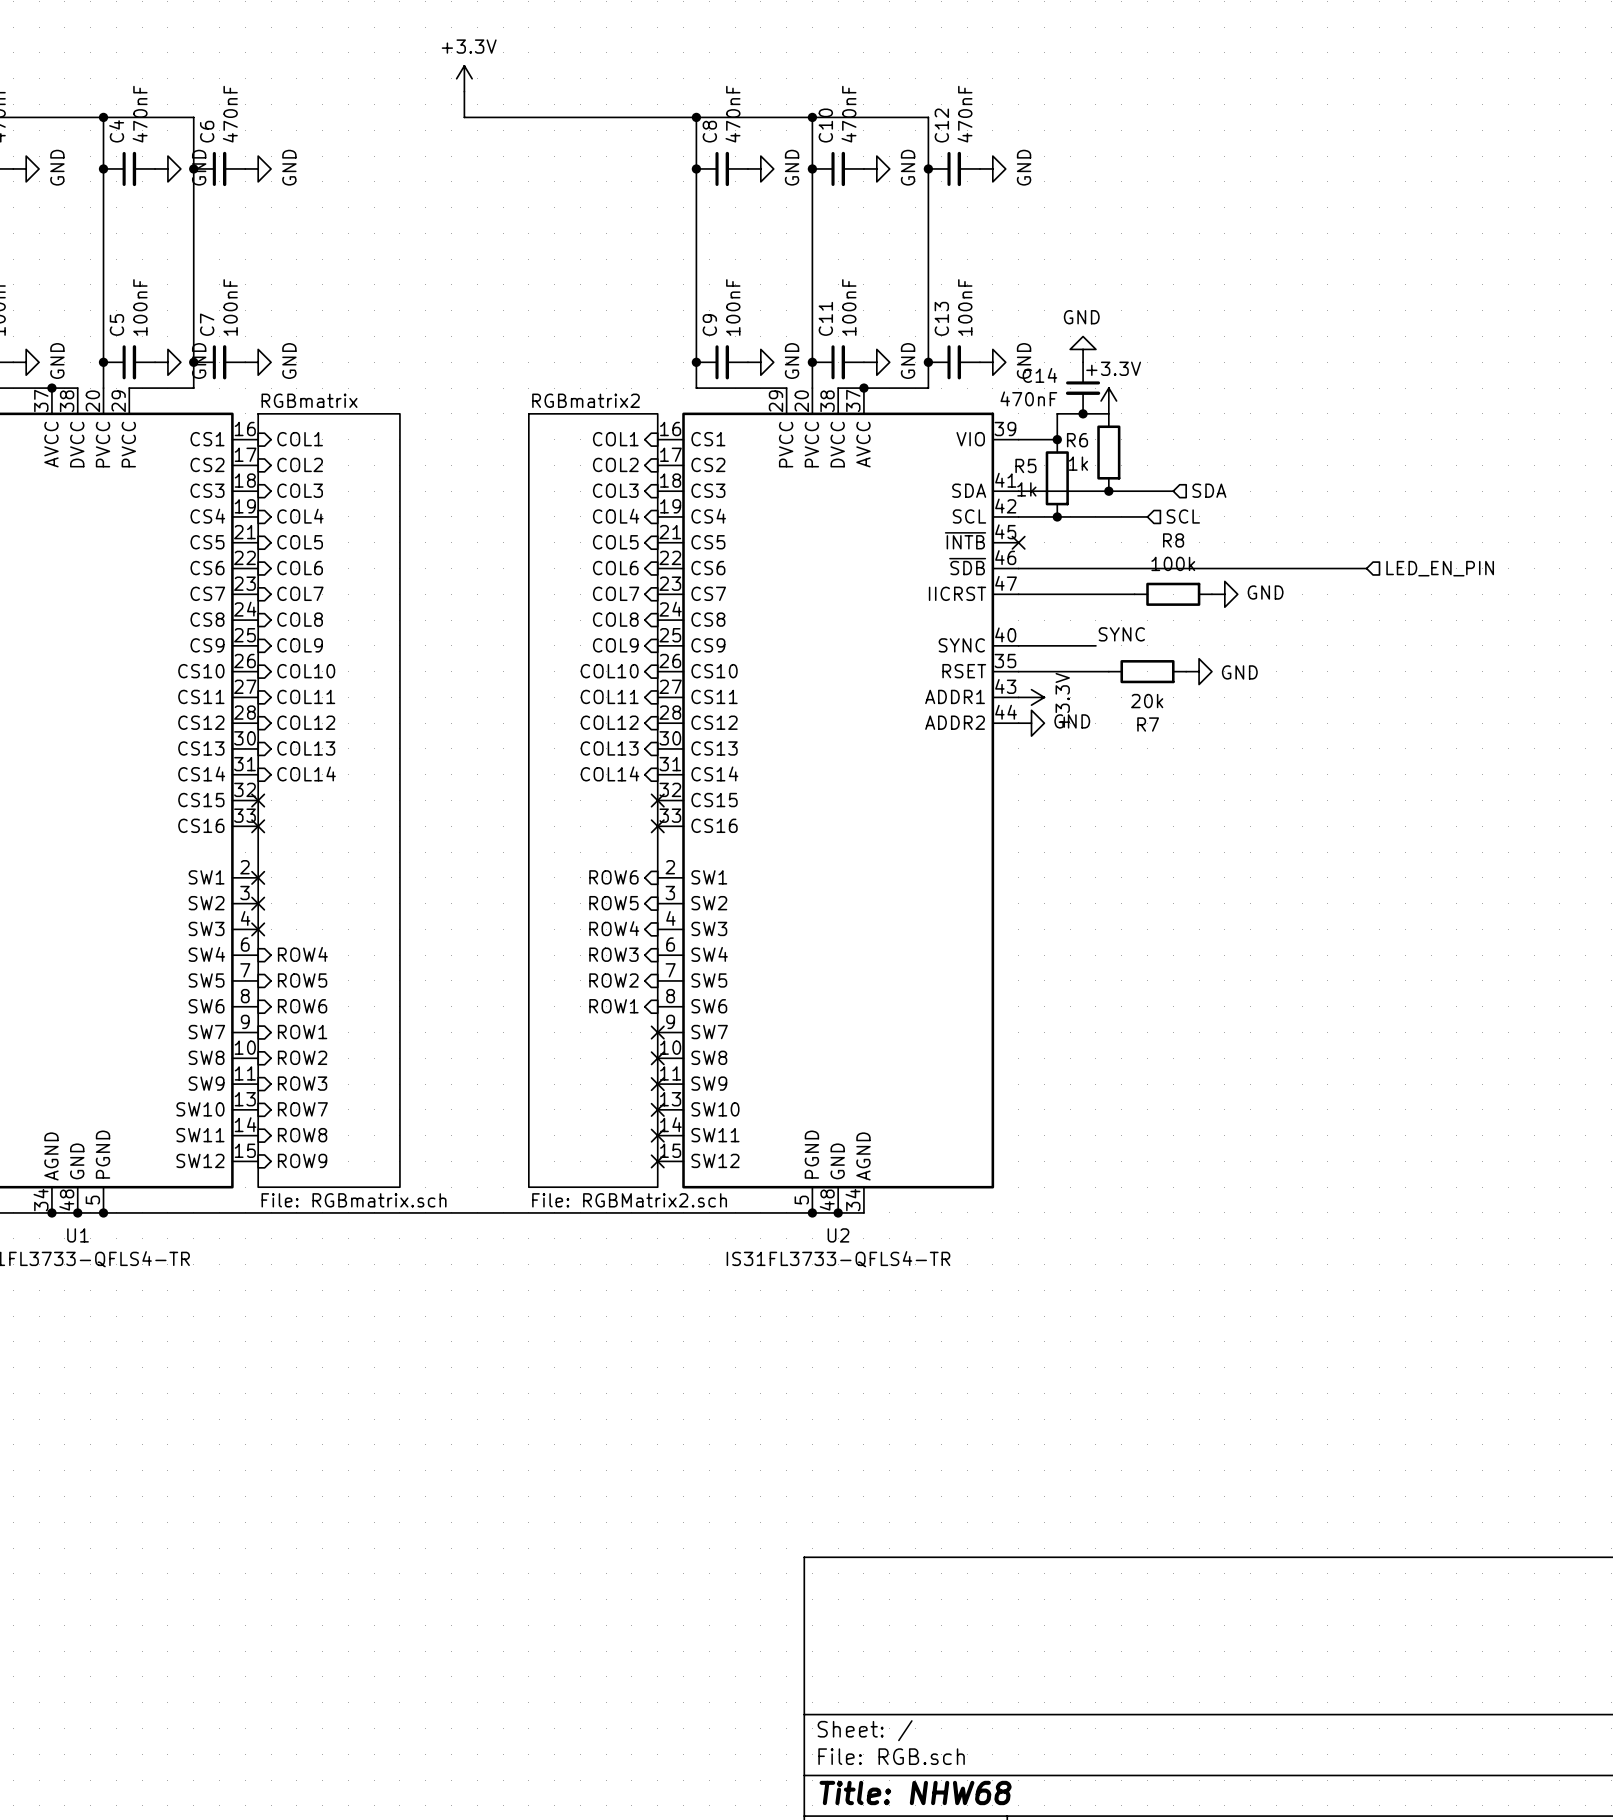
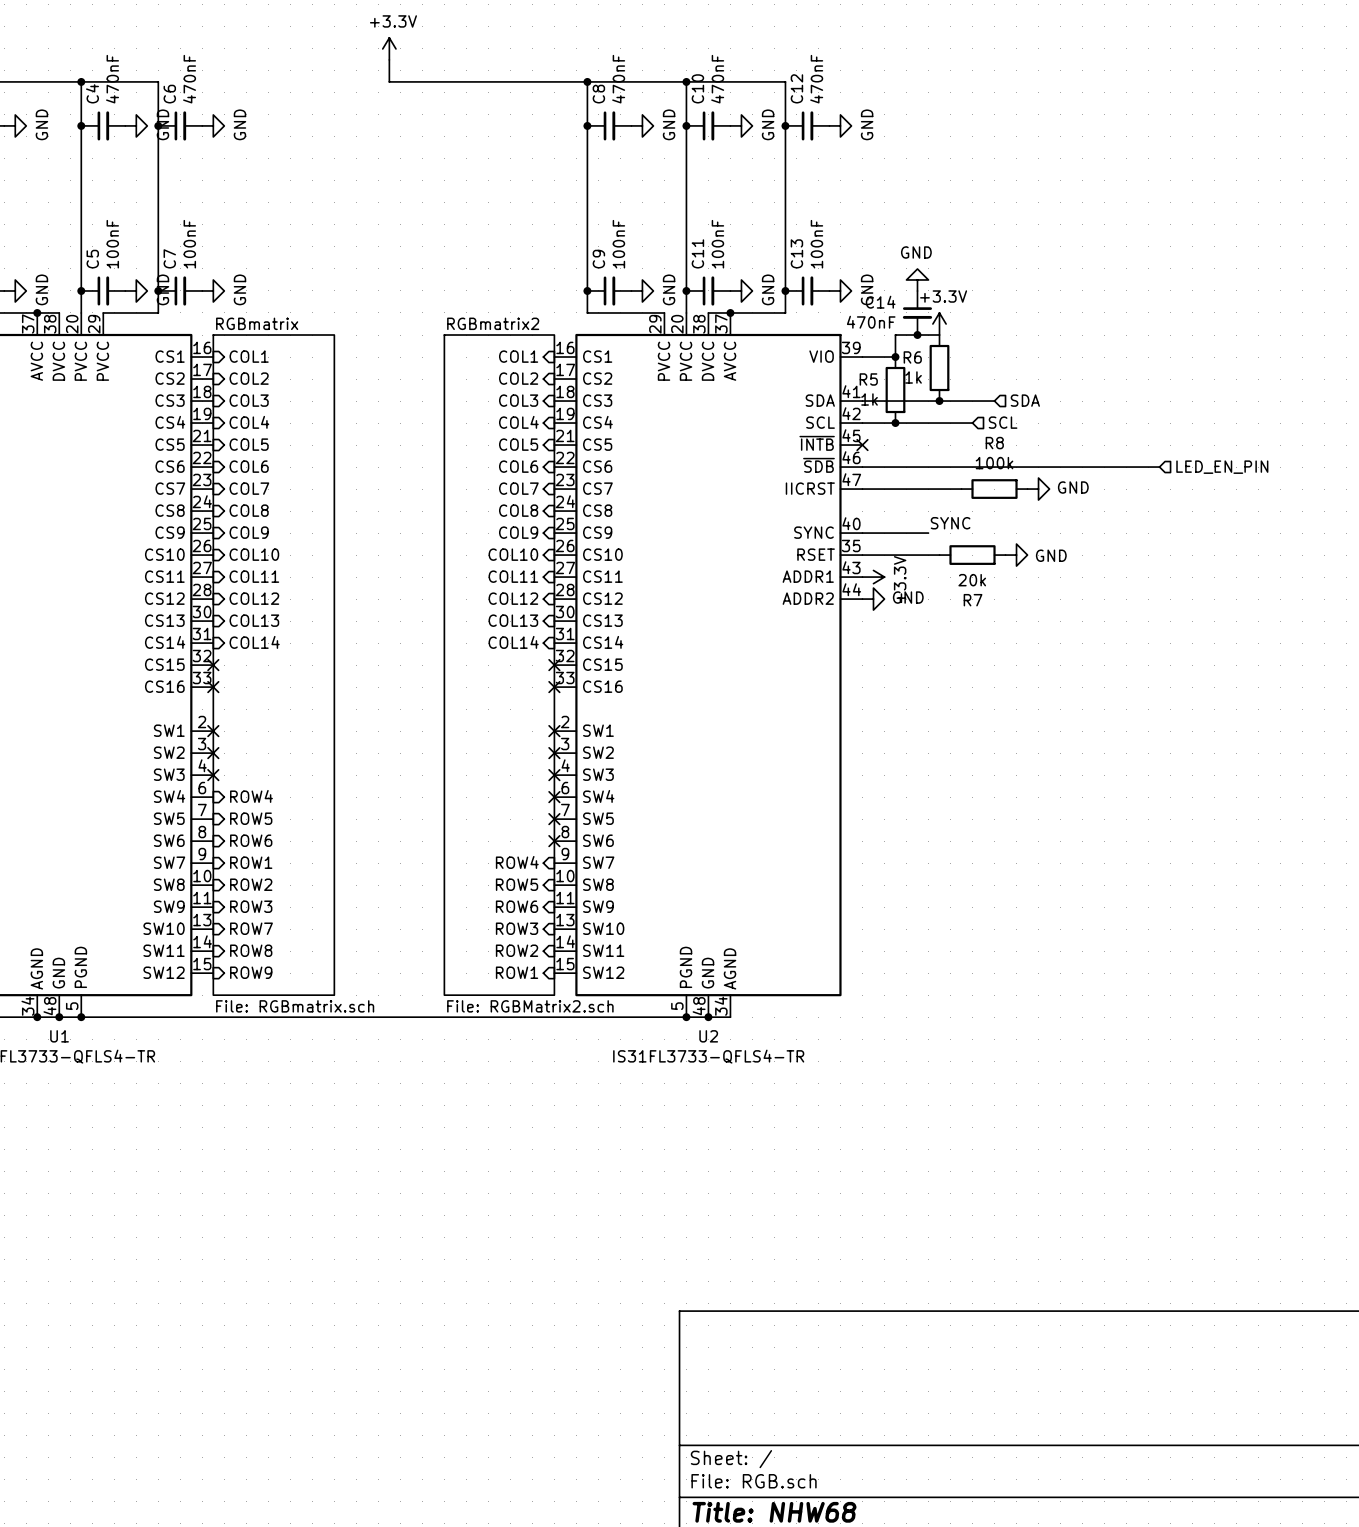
sheet pin position: ROW6 (613, 877) -> ROW6 (517, 906)
no-connect mark: none -> (554, 731)
sheet pin position: ROW5 (613, 903) -> ROW5 (517, 884)
no-connect mark: none -> (554, 753)
sheet pin position: ROW4 (614, 928) -> ROW4 (517, 862)
no-connect mark: none -> (554, 775)
sheet pin position: ROW3 (613, 954) -> ROW3 (517, 928)
no-connect mark: none -> (554, 797)
sheet pin position: ROW2 (613, 980) -> ROW2 (517, 950)
no-connect mark: none -> (554, 819)
sheet pin position: ROW1 (613, 1006) -> ROW1 (517, 972)
no-connect mark: none -> (554, 841)
no-connect mark: (657, 1032) -> none
no-connect mark: (657, 1058) -> none
no-connect mark: (657, 1084) -> none
no-connect mark: (657, 1109) -> none
no-connect mark: (657, 1135) -> none
no-connect mark: (657, 1161) -> none

